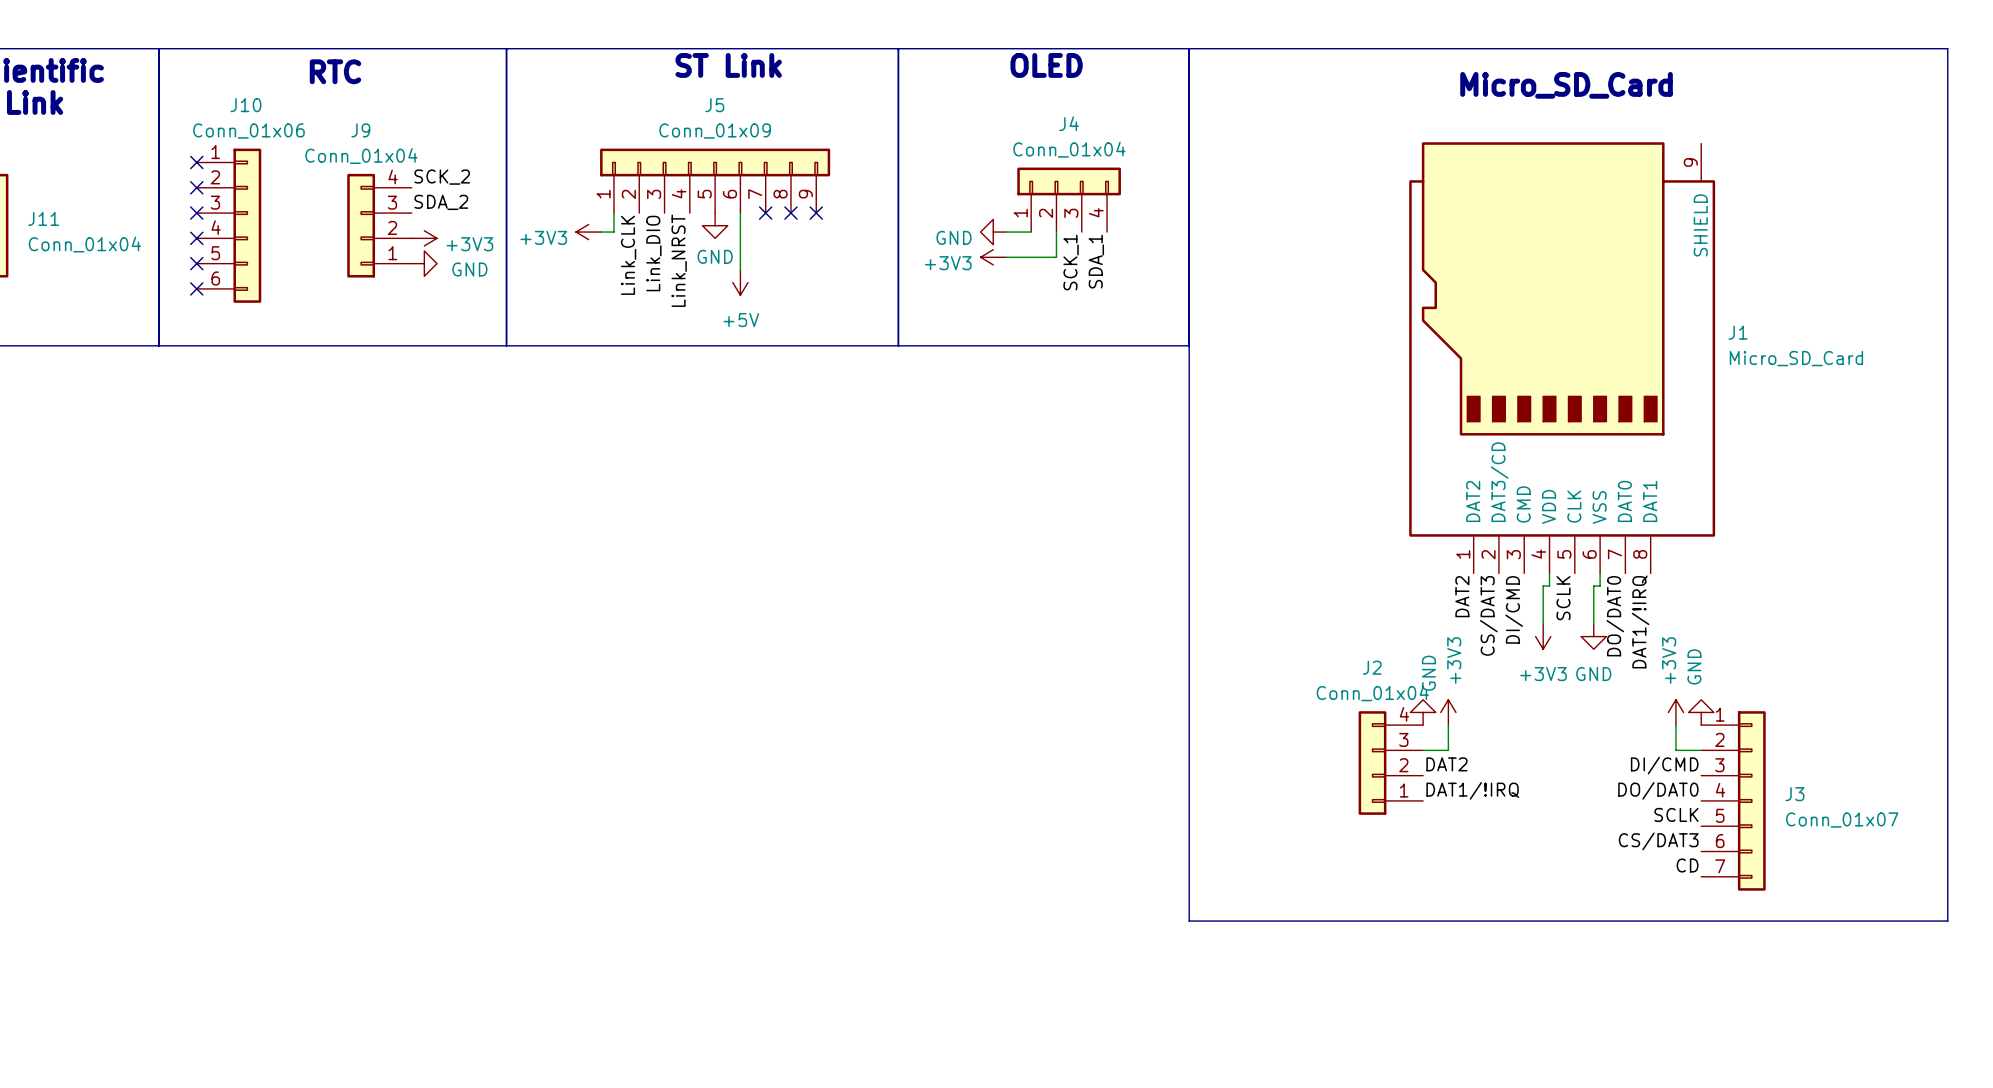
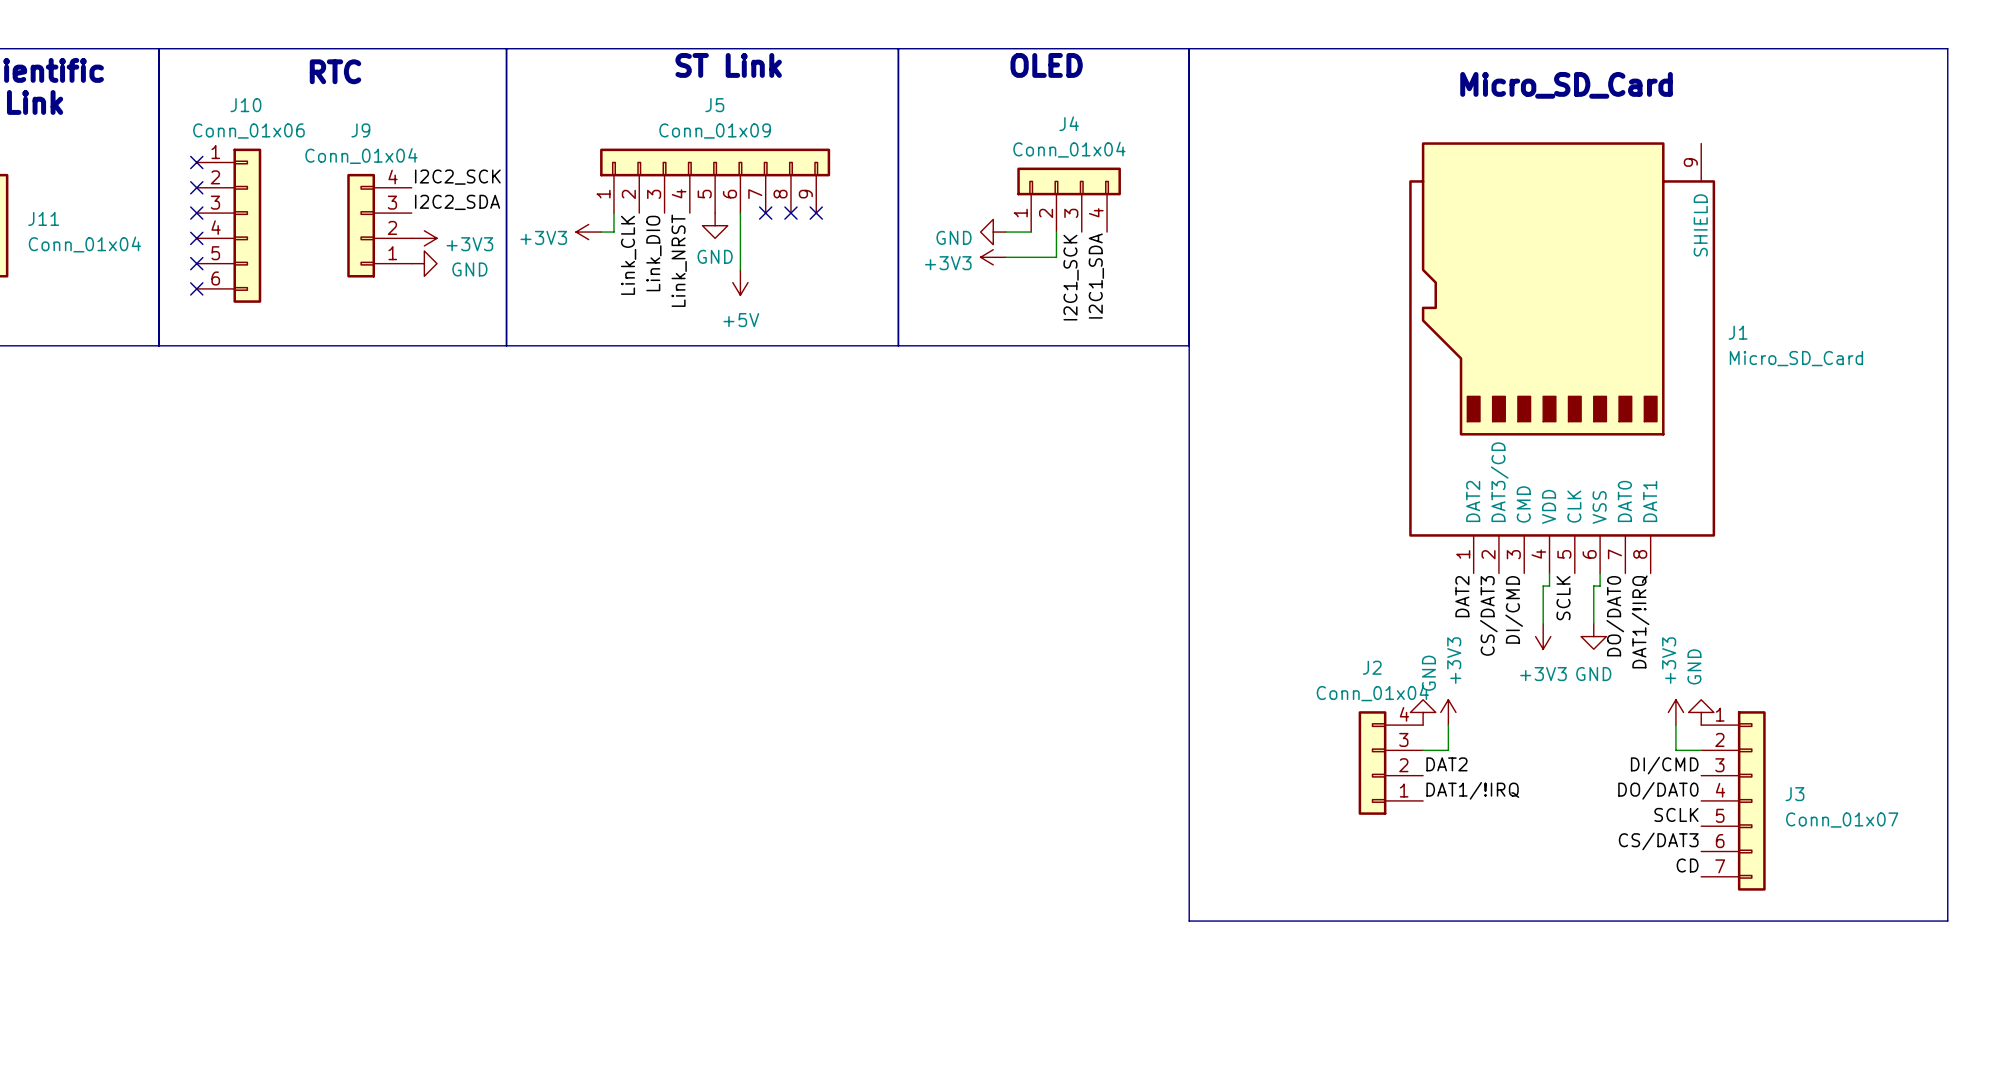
label: SCK_2 (442, 177) -> I2C2_SCK (457, 177)
label: SDA_2 (441, 202) -> I2C2_SDA (457, 202)
label: SDA_1 (1096, 261) -> I2C1_SDA (1096, 276)
label: SCK_1 (1071, 262) -> I2C1_SCK (1071, 277)

